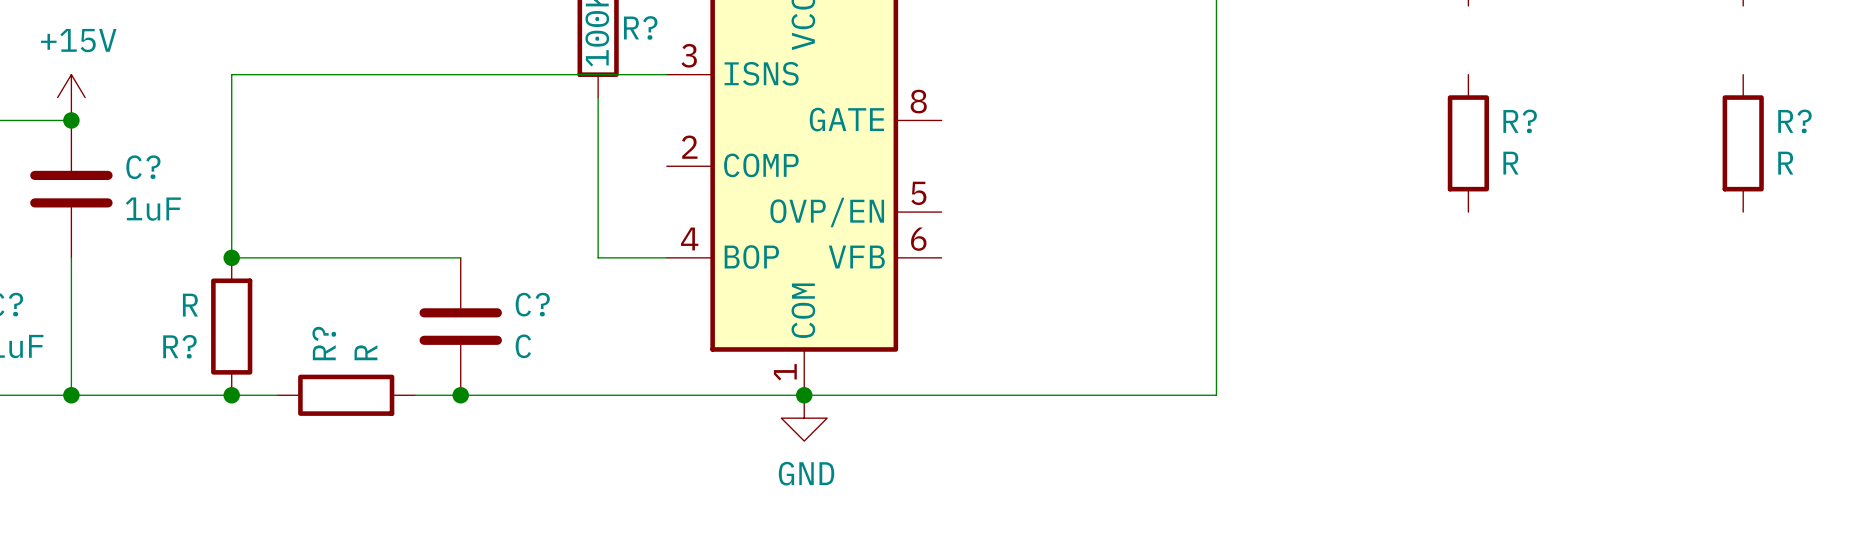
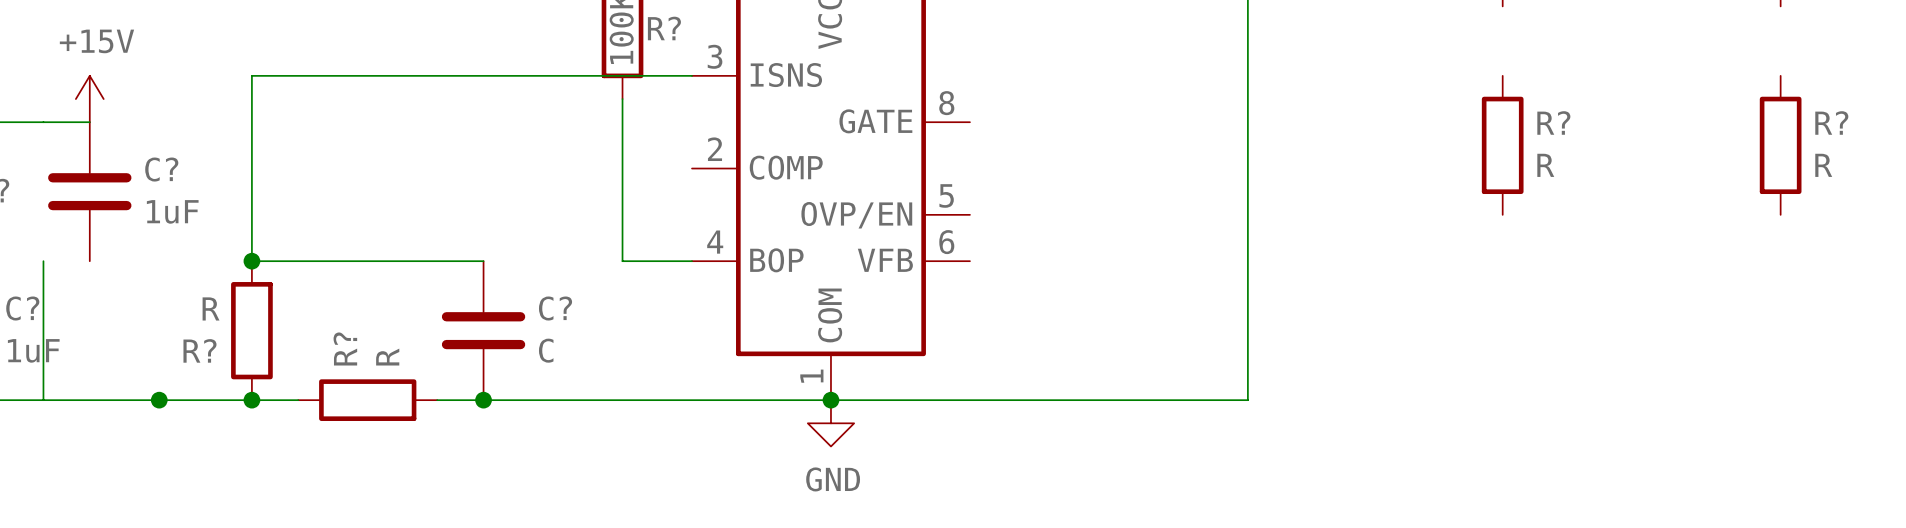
junction: (71, 120) -> none
wire: (71, 257) (71, 395) -> (43, 261) (43, 400)
junction position: (71, 395) -> (159, 400)

